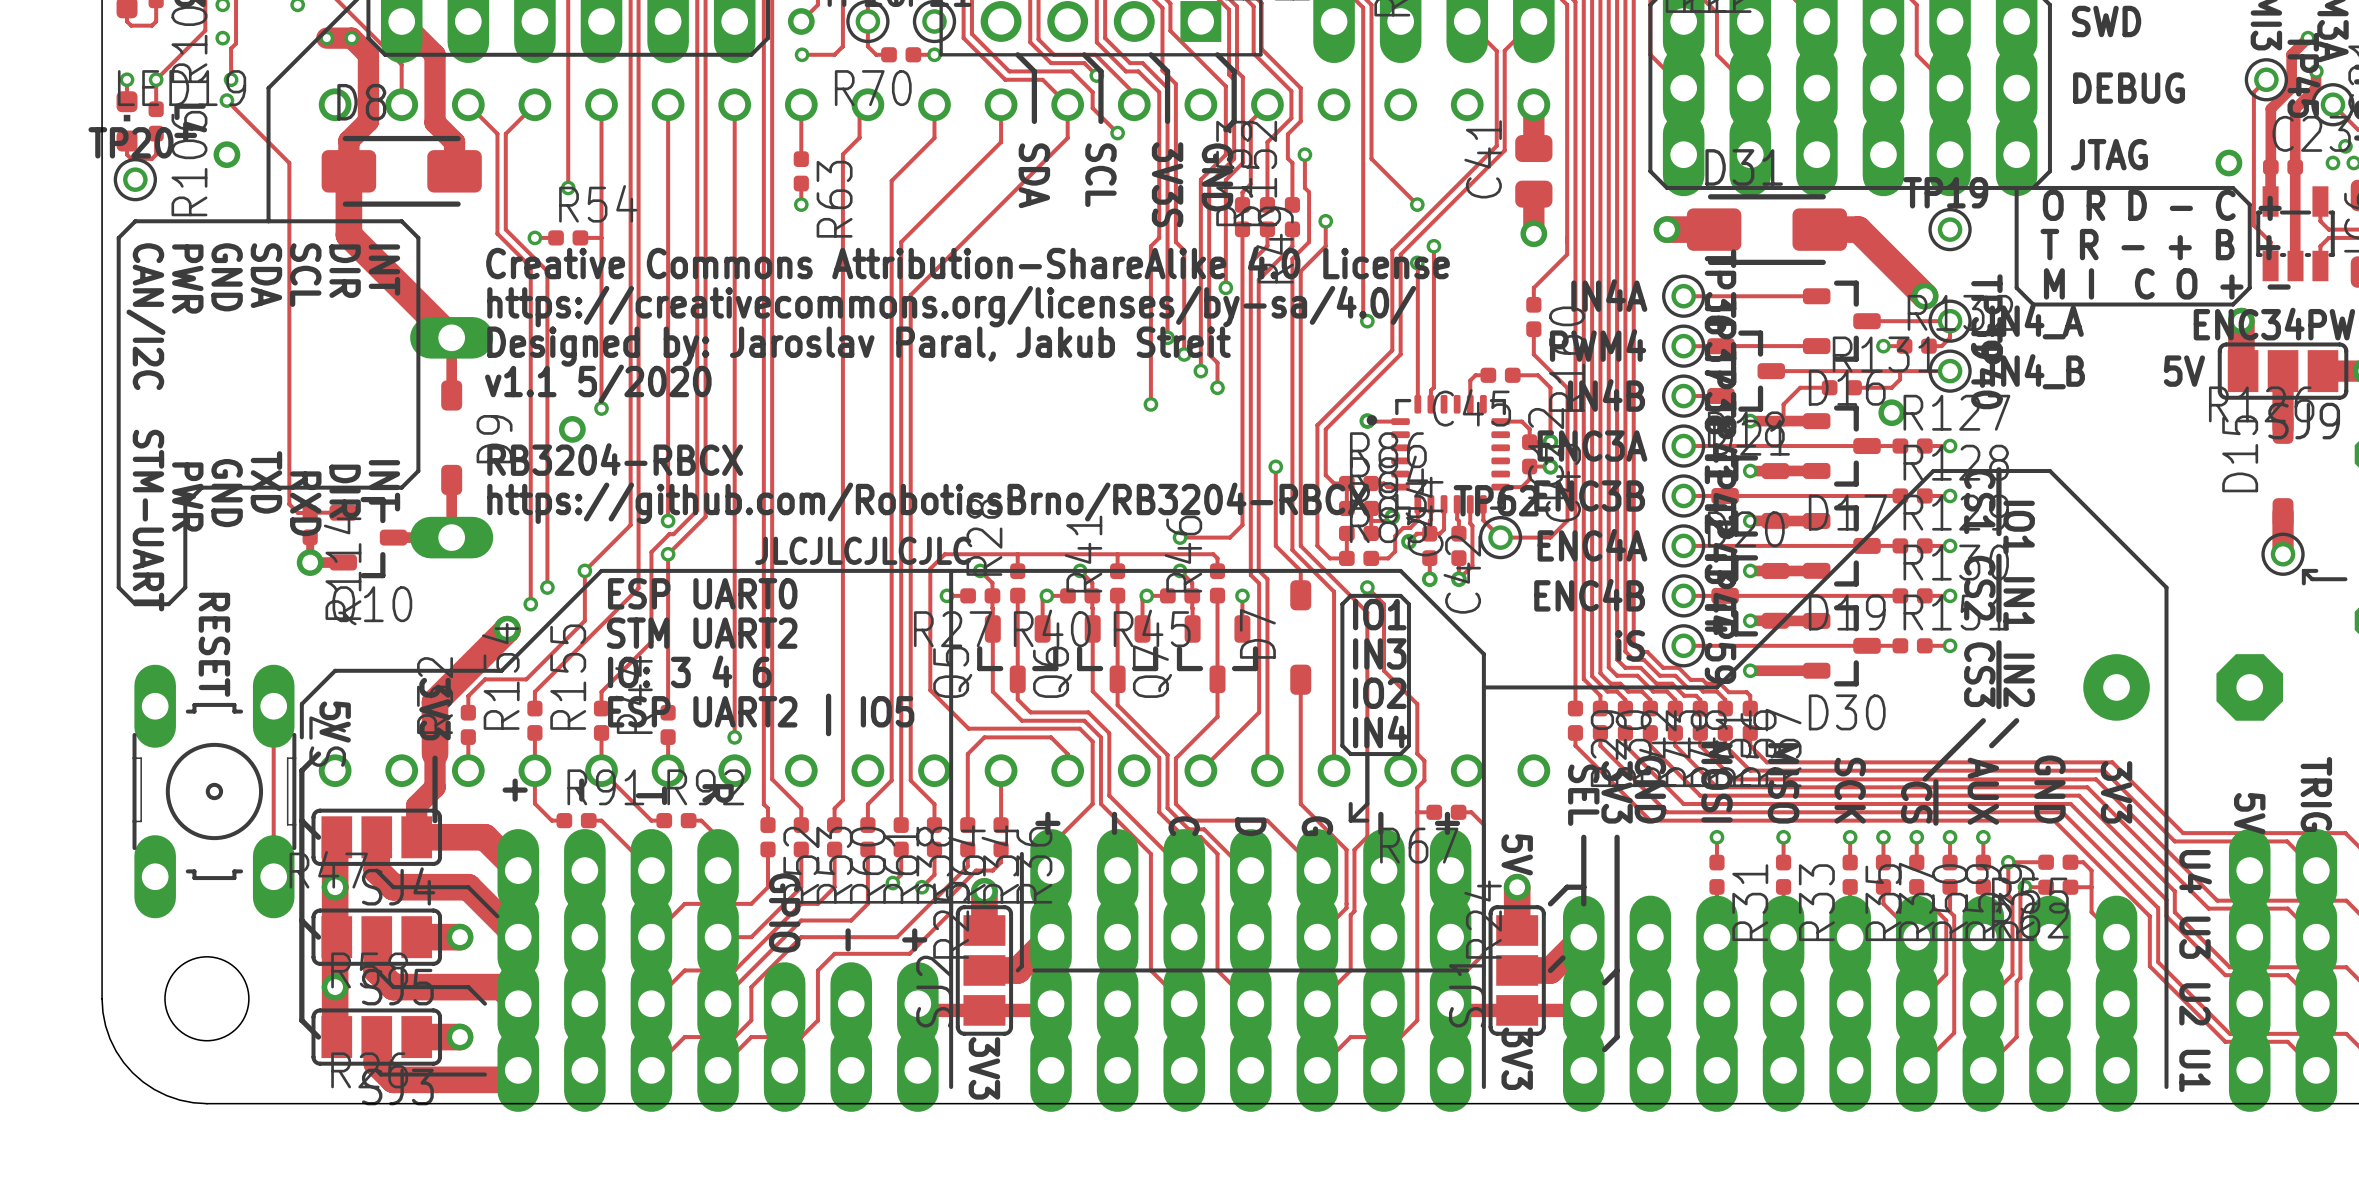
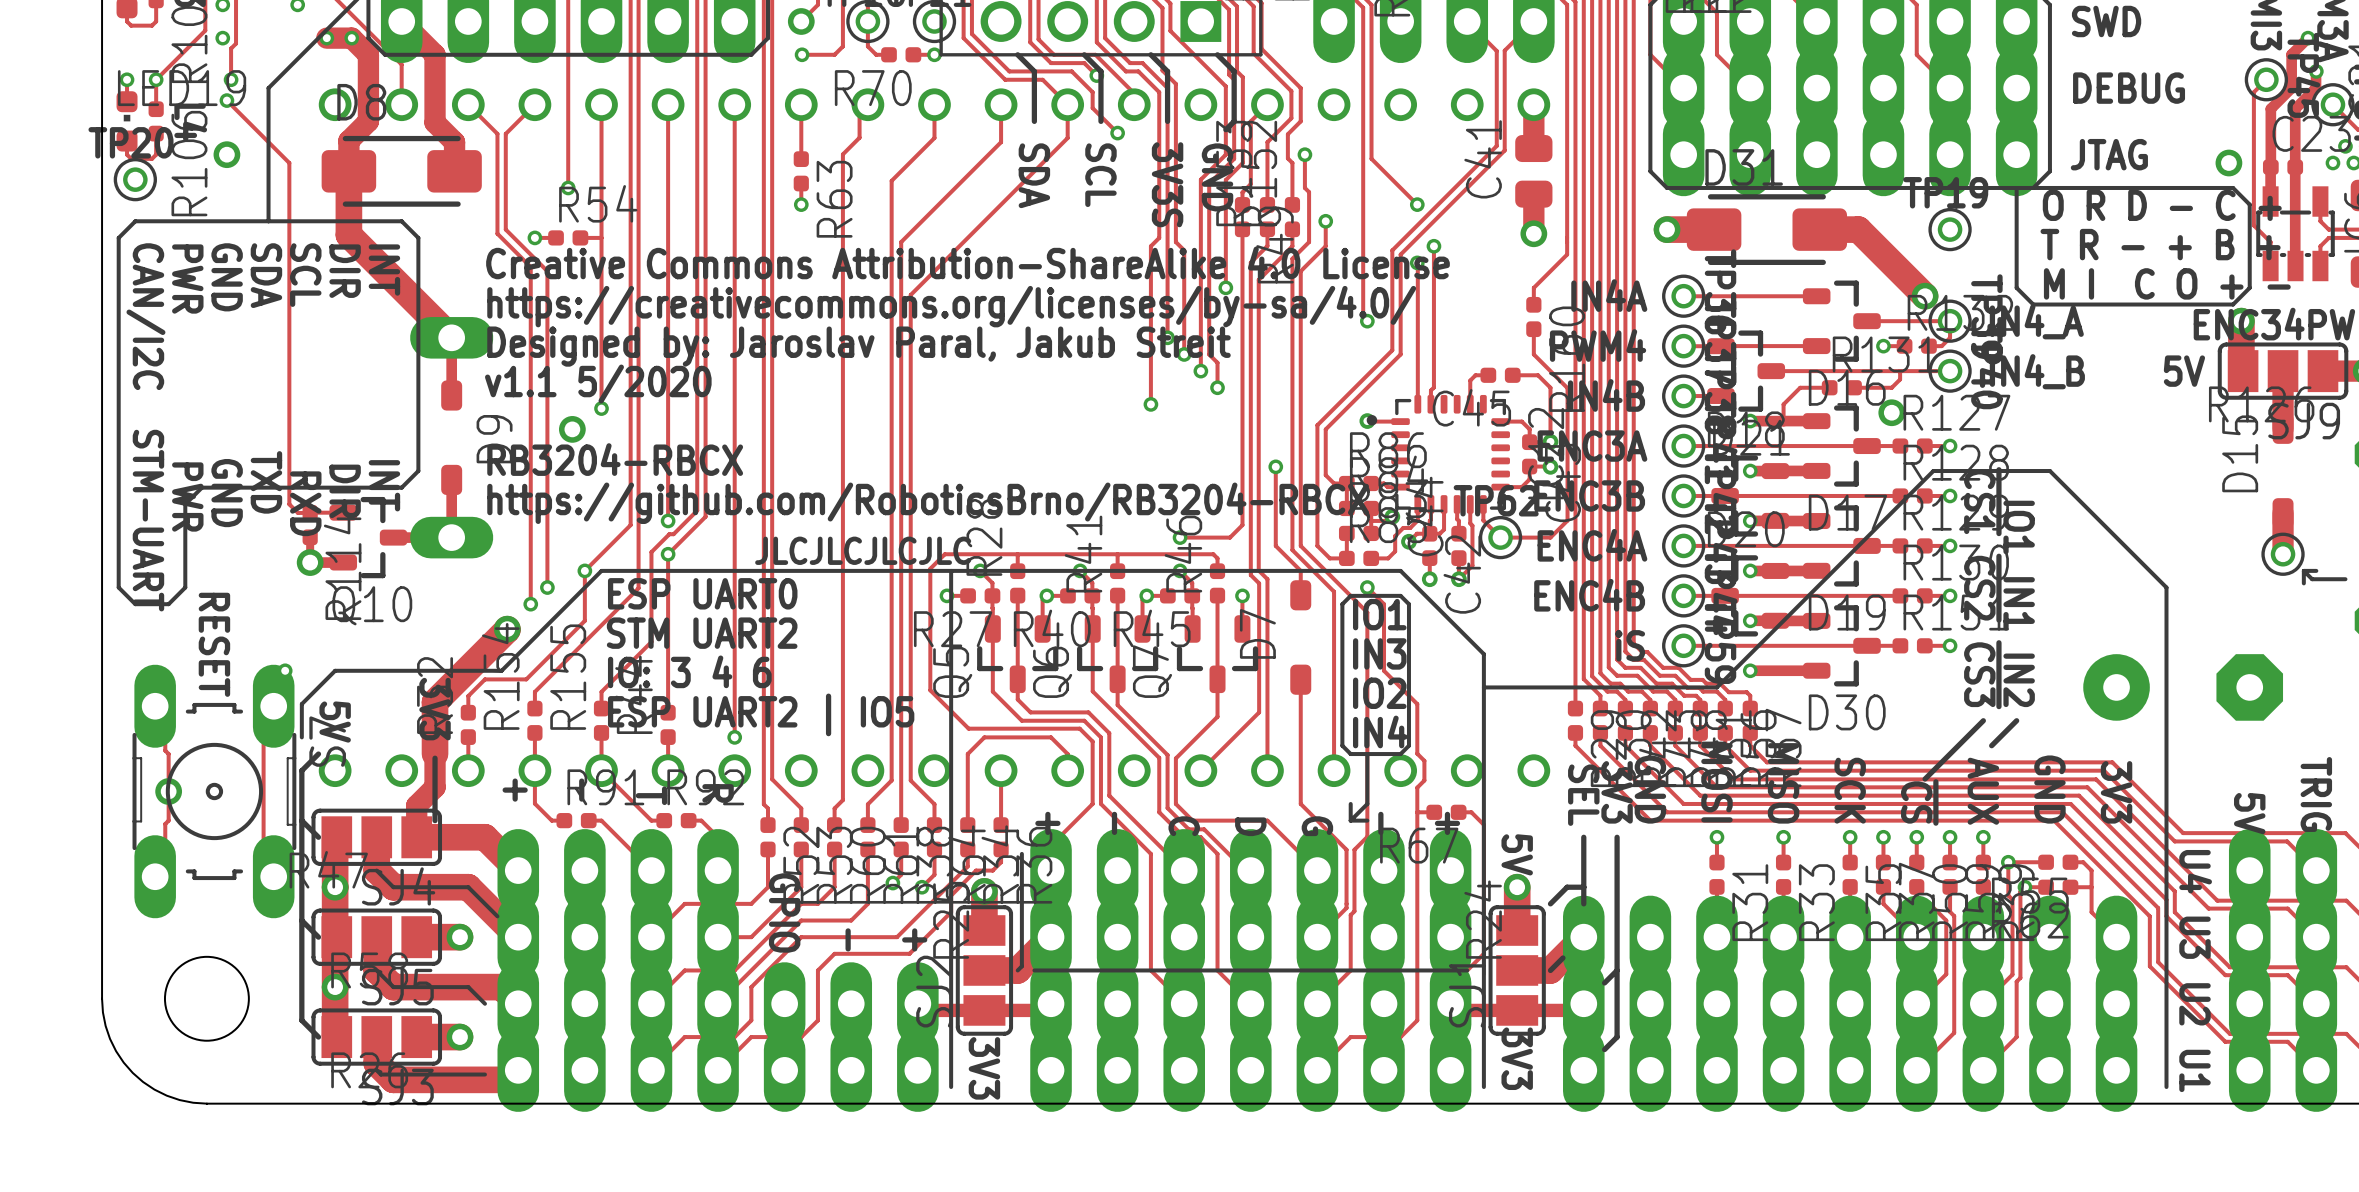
track: none -> (285, 670) (263, 692) (263, 870)
via: none -> (285, 670)
track: (273, 706) (273, 876) -> none
track: none -> (165, 712) (165, 750) (168, 754) (168, 820) (165, 824) (165, 870)
via: none -> (168, 791)

